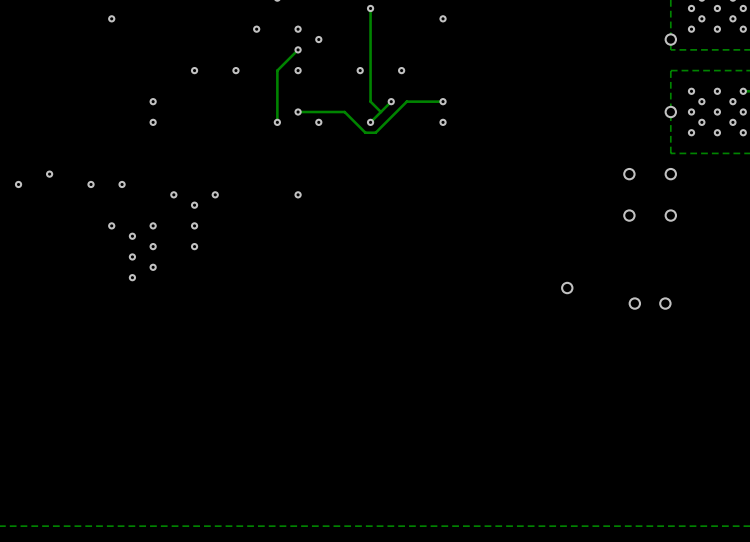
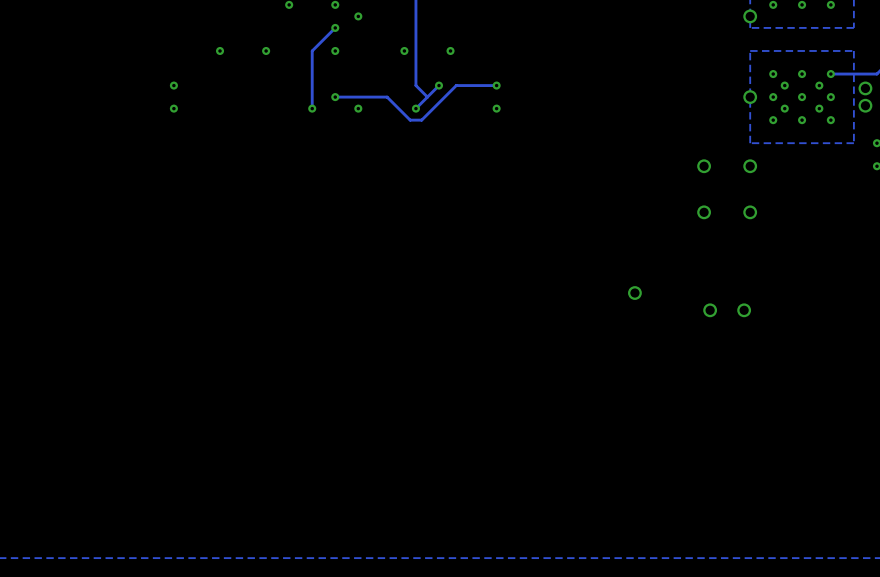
via: (49, 174) -> none
via: (18, 184) -> none
via: (91, 184) -> none
via: (122, 184) -> none
via: (173, 194) -> none
via: (215, 194) -> none
via: (298, 194) -> none
via: (194, 205) -> none
via: (111, 225) -> none
via: (153, 225) -> none
via: (194, 225) -> none
via: (132, 236) -> none
via: (153, 246) -> none
via: (194, 246) -> none
via: (132, 256) -> none
via: (153, 267) -> none
via: (132, 277) -> none

